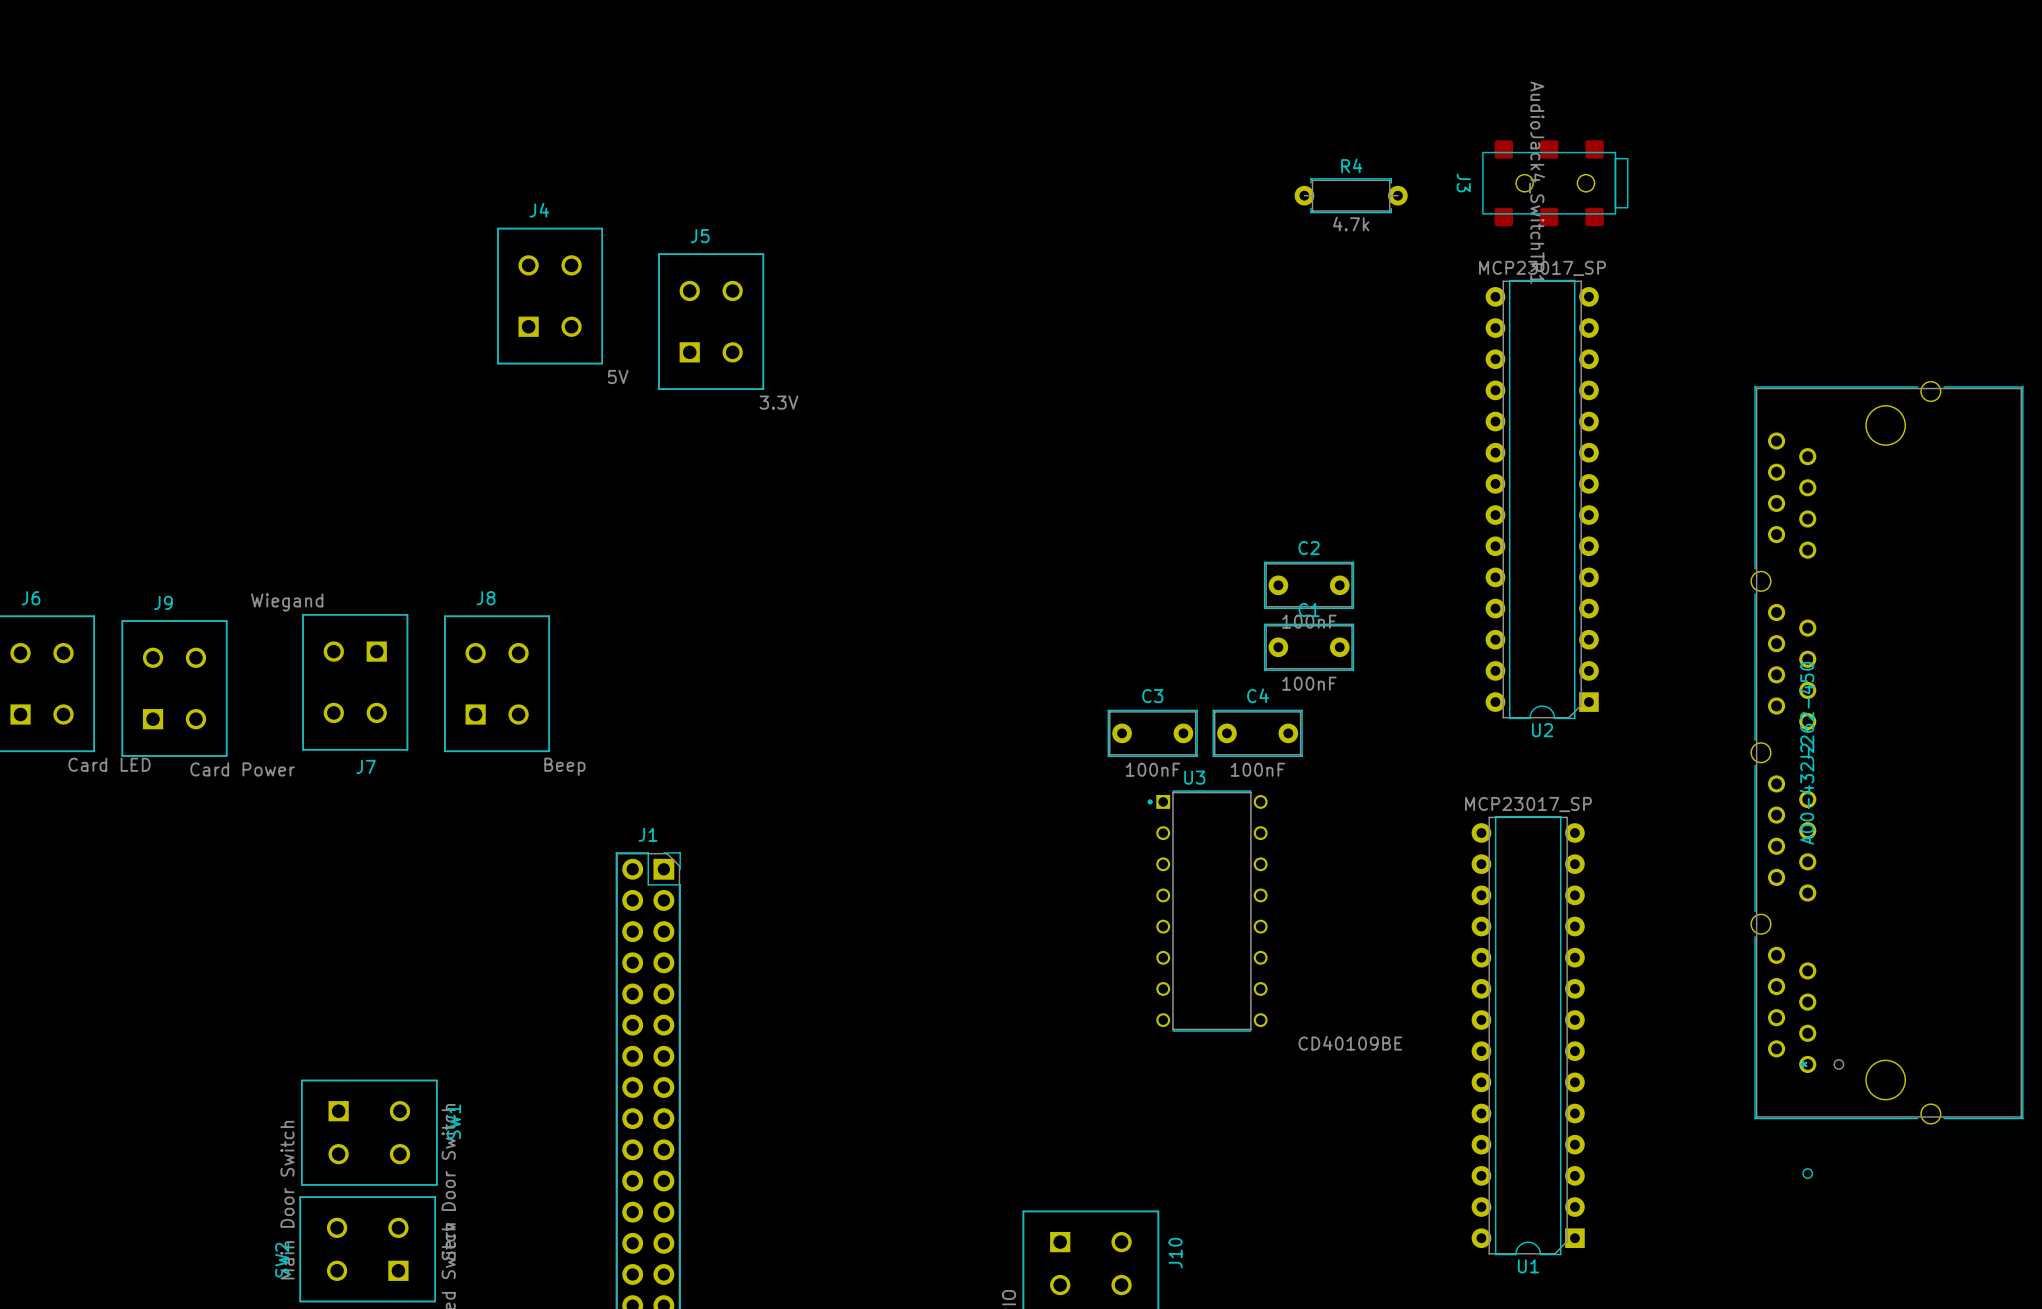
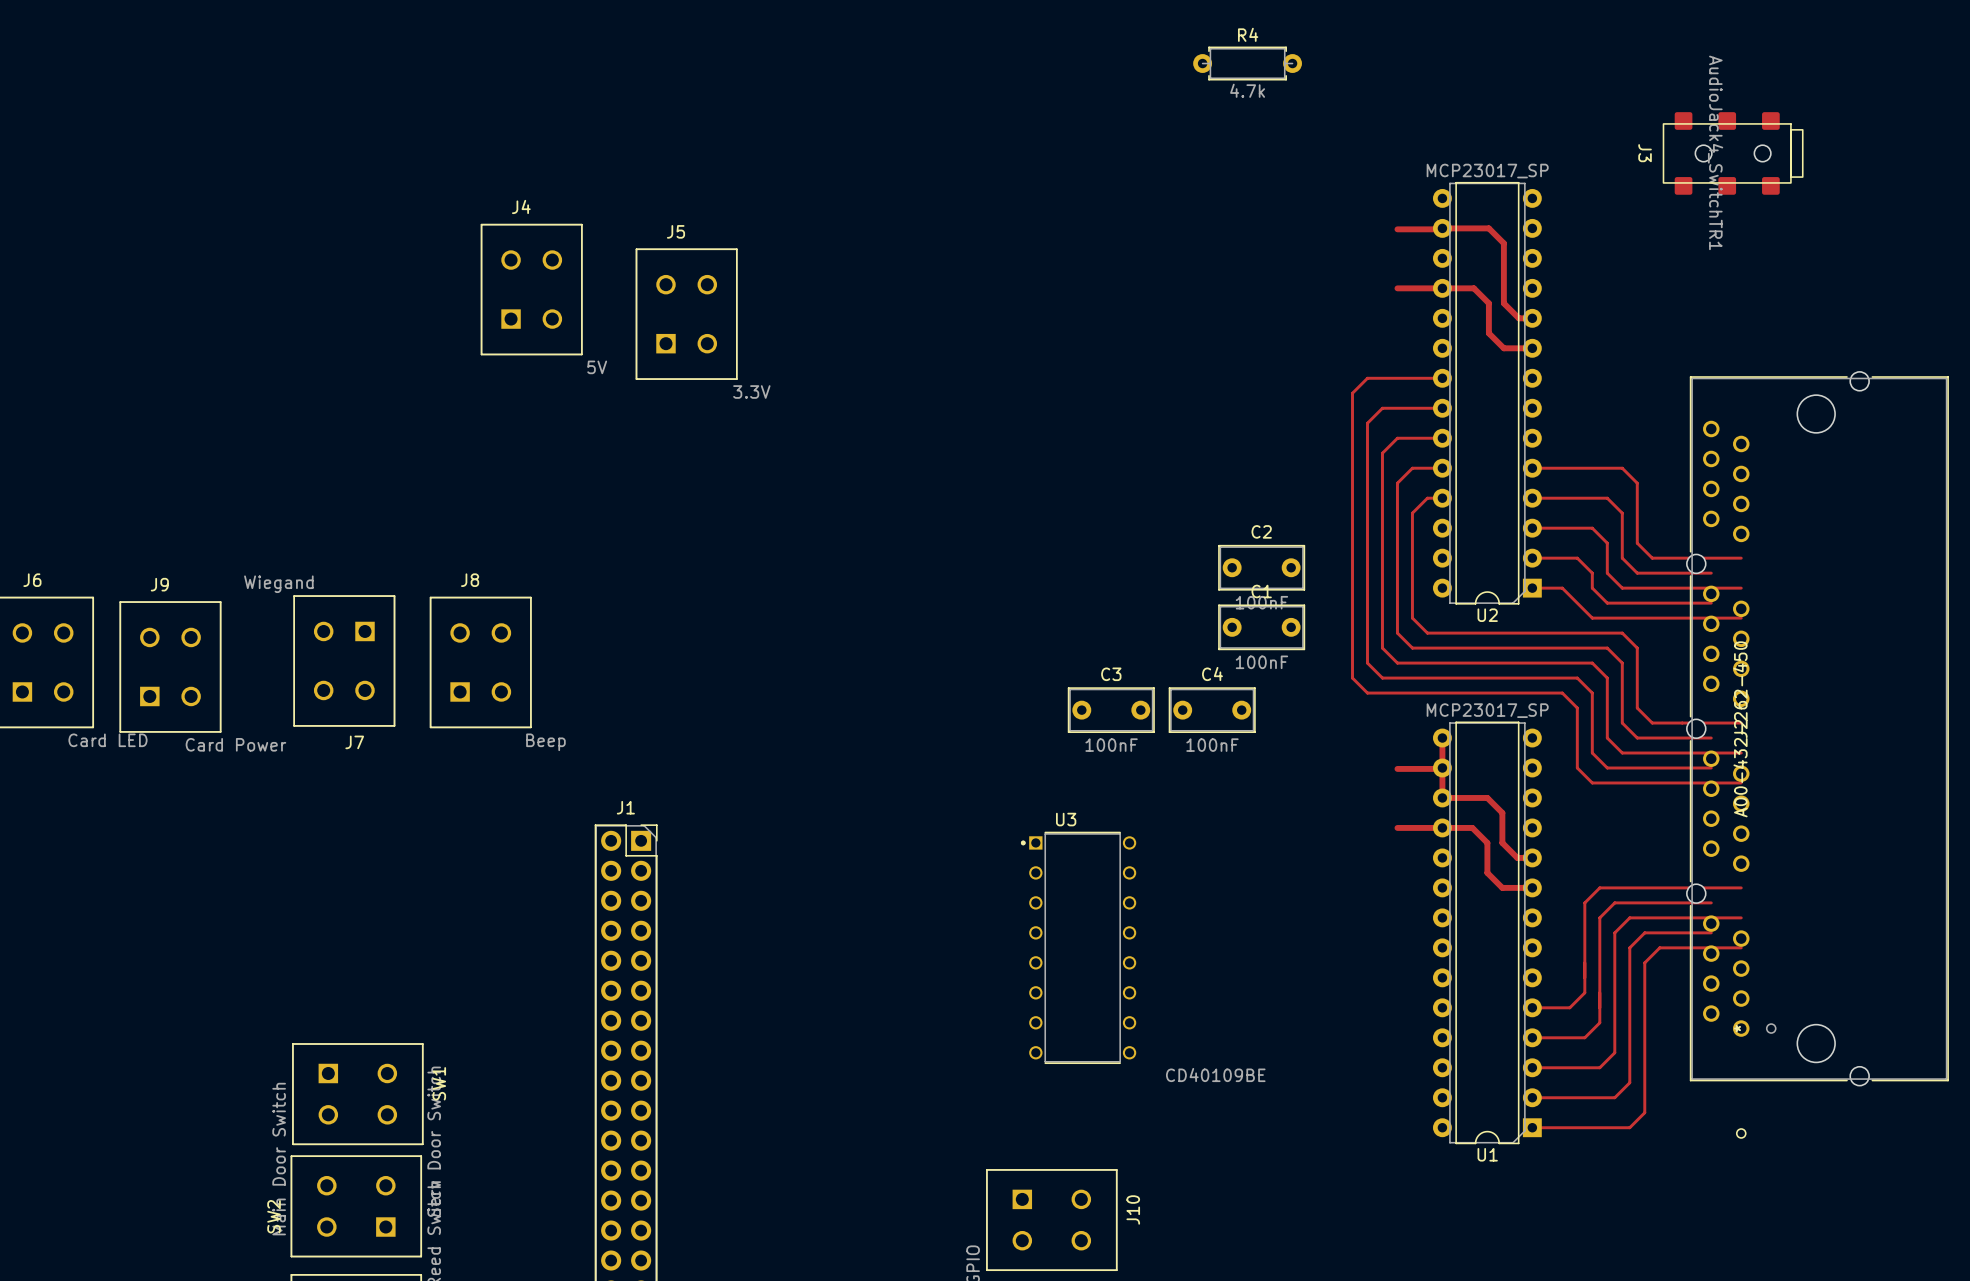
J3 position: (1555, 183) -> (1733, 153)
R4 position: (1351, 195) -> (1247, 63)
track: none -> (1397, 229) (1488, 228) (1503, 243) (1503, 303) (1518, 318) (1532, 318)
track: none -> (1397, 288) (1473, 288) (1488, 303) (1488, 333) (1503, 348) (1532, 348)
track: none -> (1442, 378) (1367, 378) (1352, 393) (1352, 678) (1367, 693) (1562, 693) (1577, 708) (1577, 767) (1592, 782) (1741, 782)
track: none -> (1442, 408) (1382, 408) (1367, 423) (1367, 663) (1382, 678) (1577, 678) (1592, 693) (1592, 753) (1607, 767) (1711, 767)
track: none -> (1442, 438) (1397, 438) (1382, 453) (1382, 648) (1397, 663) (1592, 663) (1607, 678) (1607, 738) (1622, 753) (1741, 753)
track: none -> (1442, 468) (1412, 468) (1397, 483) (1397, 633) (1412, 648) (1607, 648) (1622, 663) (1622, 723) (1637, 738) (1711, 738)
track: none -> (1532, 468) (1622, 468) (1637, 483) (1637, 543) (1652, 558) (1741, 558)
U2 position: (1542, 499) -> (1487, 393)
track: none -> (1442, 498) (1427, 498) (1412, 513) (1412, 618) (1427, 633) (1622, 633) (1637, 648) (1637, 708) (1652, 723) (1741, 723)
track: none -> (1532, 498) (1607, 498) (1622, 513) (1622, 558) (1637, 573) (1711, 573)
track: none -> (1532, 528) (1592, 528) (1607, 543) (1607, 573) (1622, 588) (1741, 588)
track: none -> (1532, 558) (1577, 558) (1592, 573) (1592, 588) (1607, 603) (1711, 603)
track: none -> (1532, 588) (1562, 588) (1592, 618) (1741, 618)
track: none -> (1442, 738) (1442, 797) (1487, 797) (1502, 812) (1502, 842) (1517, 857) (1532, 857)
track: none -> (1442, 767) (1397, 768)
track: none -> (1397, 827) (1472, 827) (1487, 842) (1487, 872) (1502, 887) (1532, 887)
U3 position: (1207, 911) -> (1078, 947)
track: none -> (1741, 887) (1599, 887) (1584, 902) (1584, 992) (1569, 1007) (1532, 1007)
track: none -> (1711, 902) (1614, 902) (1599, 917) (1599, 1022) (1584, 1037) (1532, 1037)
track: none -> (1741, 917) (1629, 917) (1614, 932) (1614, 1052) (1599, 1067) (1532, 1067)
track: none -> (1711, 932) (1644, 932) (1629, 947) (1629, 1082) (1614, 1097) (1532, 1097)
track: none -> (1741, 947) (1659, 947) (1644, 962) (1644, 1112) (1629, 1127) (1532, 1127)
U1 position: (1528, 1035) -> (1487, 932)

